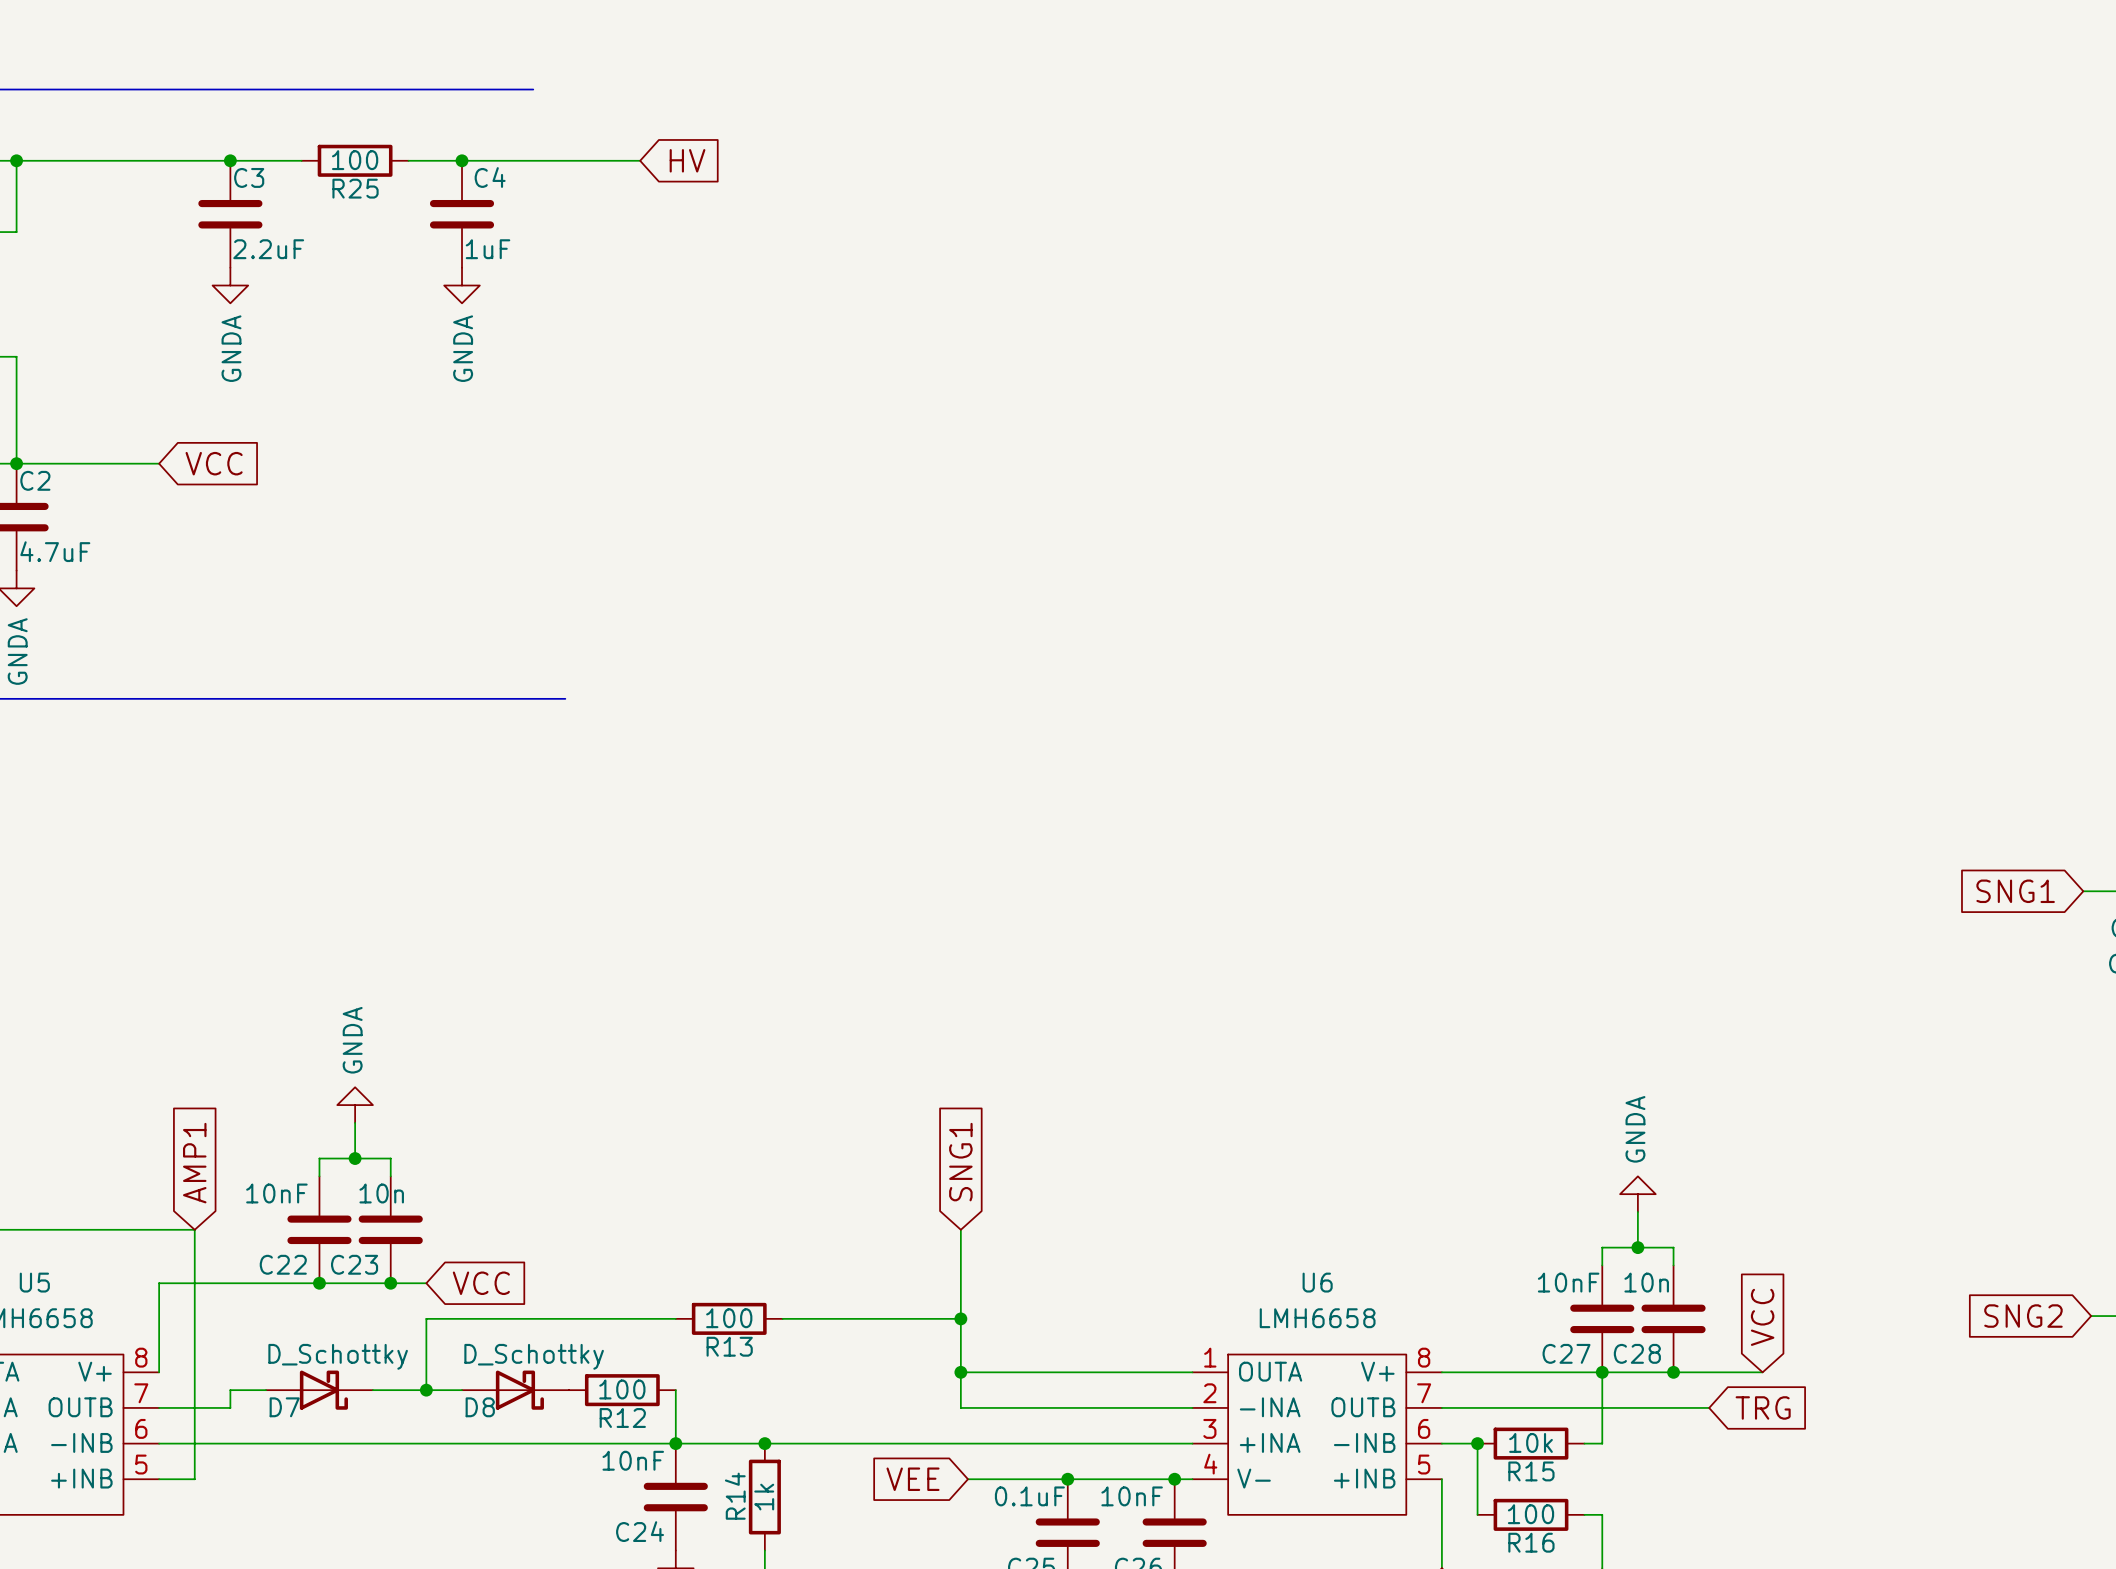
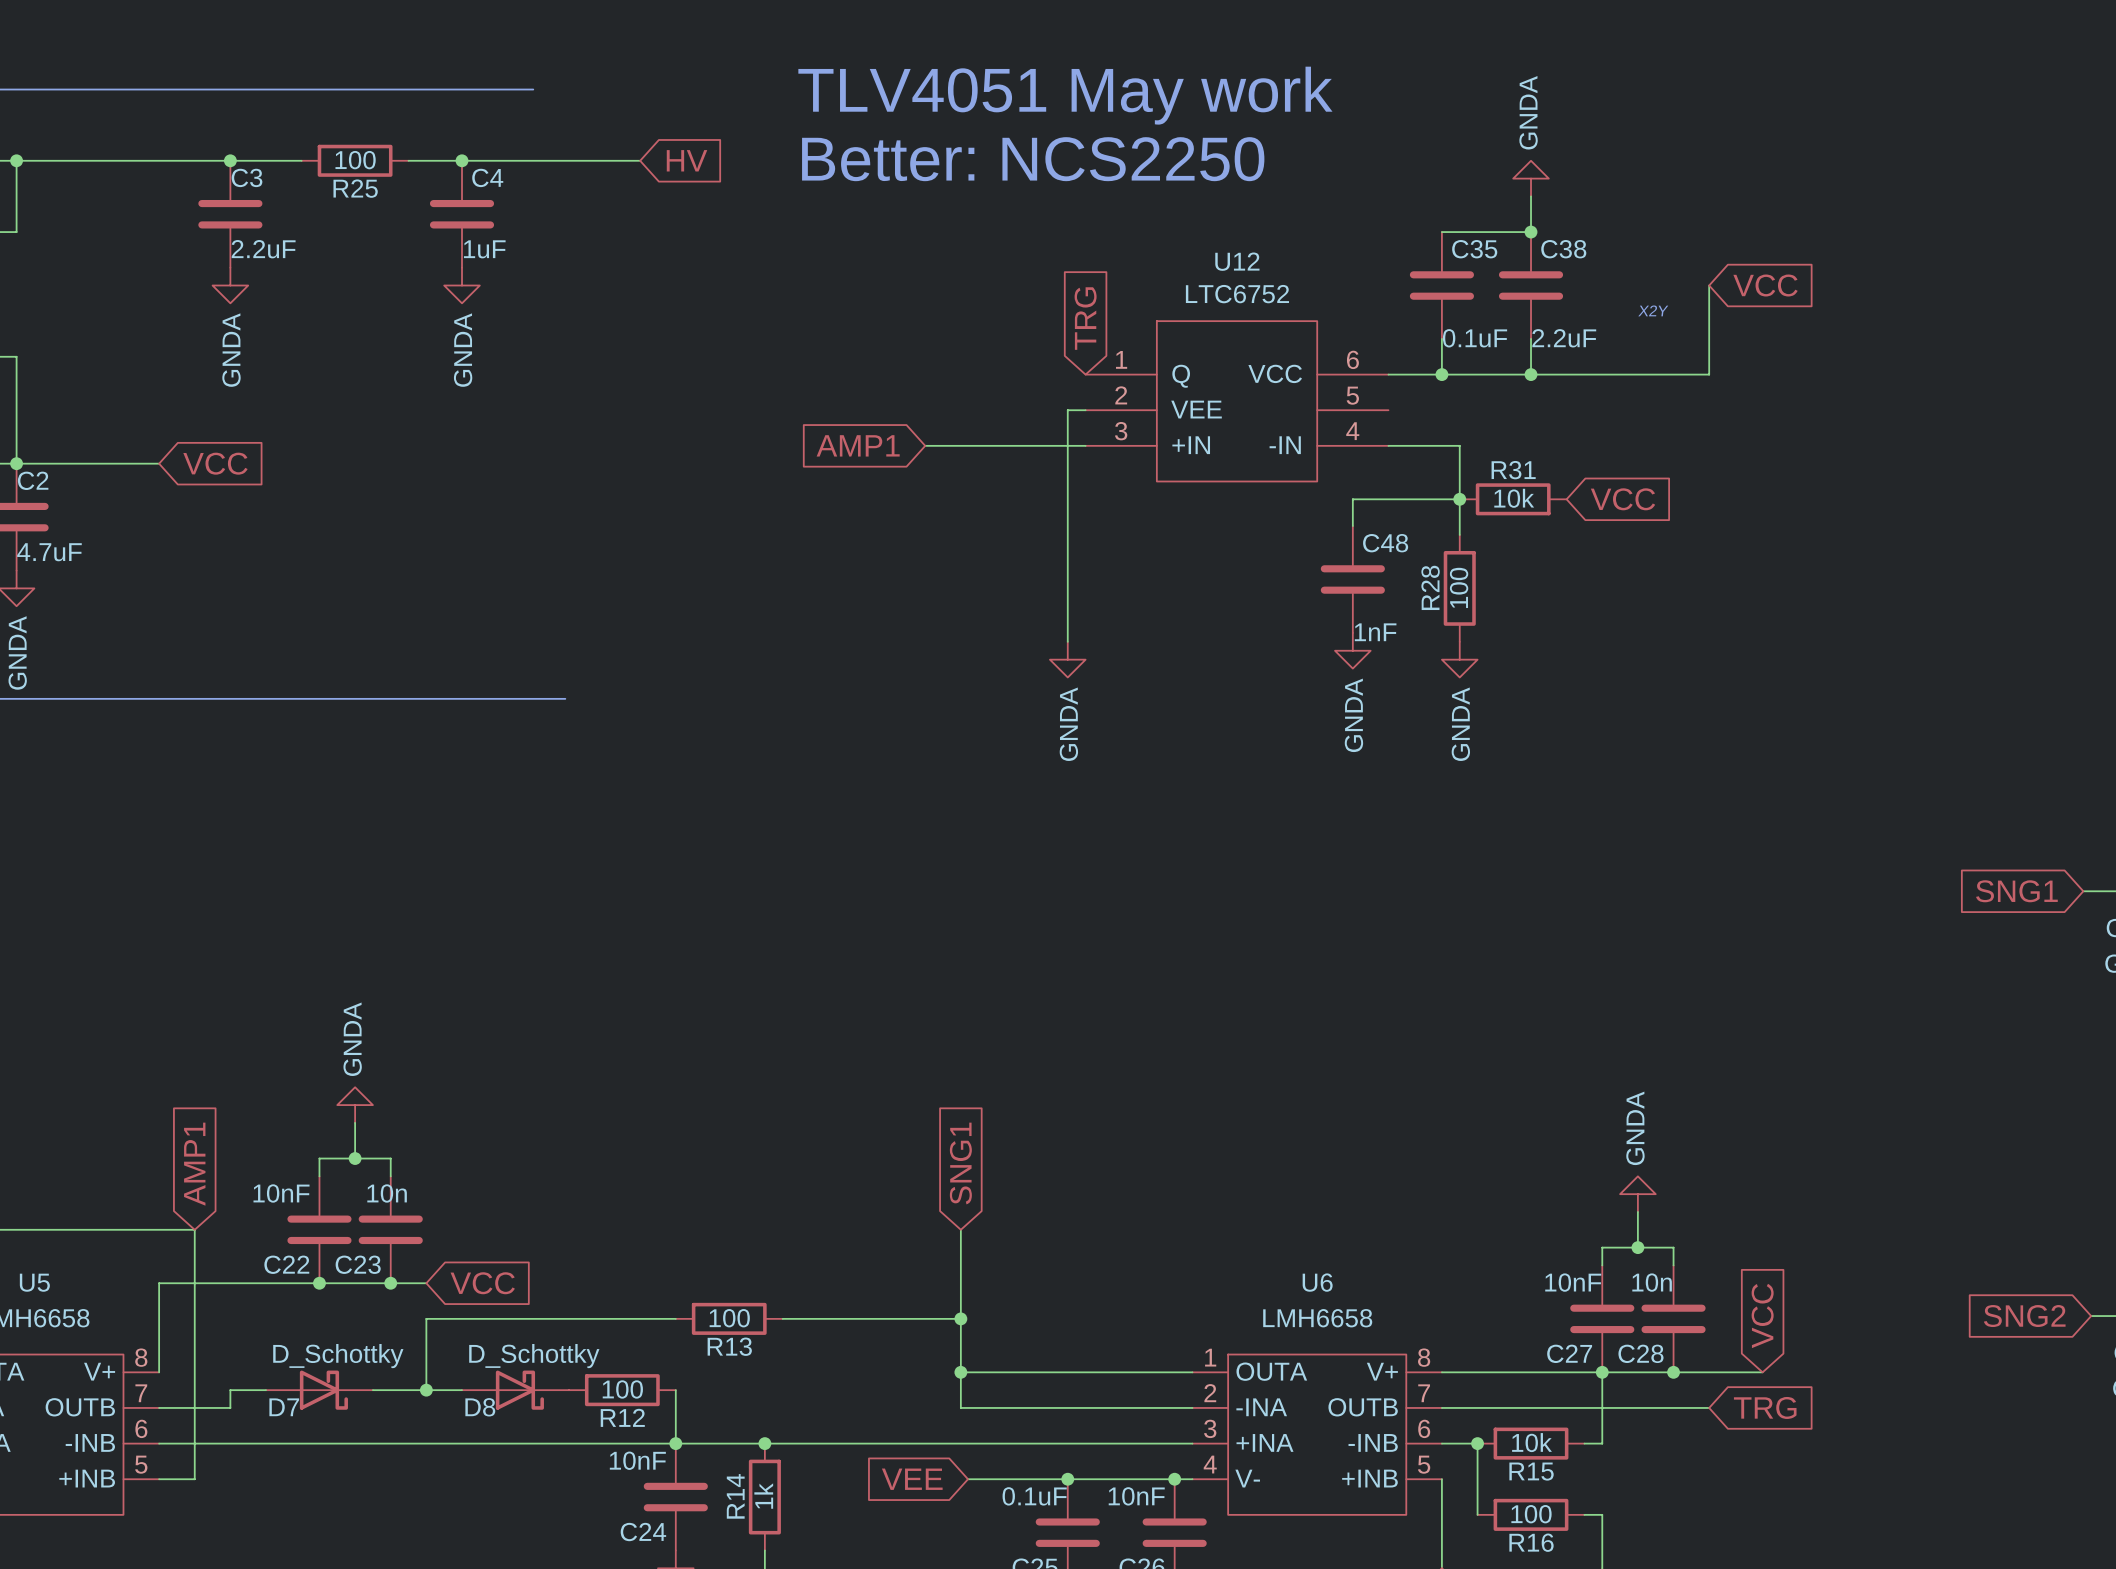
text: none -> TLV4051 May work (1065, 95)
text: none -> Better: NCS2250 (1033, 159)
power symbol: none -> GNDA (1531, 178)
wire: none -> (1531, 196) (1531, 232) (1441, 232)
junction: none -> (1531, 232)
C35: none -> 0.1uF (1441, 285)
C38: none -> 2.2uF (1531, 285)
wire: none -> (1709, 285) (1709, 374) (1388, 374)
global label: none -> VCC (1765, 285)
text: none -> X2Y (1653, 310)
global label: none -> TRG (1085, 318)
wire: none -> (1441, 338) (1441, 374)
wire: none -> (1531, 338) (1531, 374)
junction: none -> (1441, 374)
junction: none -> (1531, 374)
U12: none -> LTC6752 (1237, 401)
wire: none -> (1085, 410) (1067, 410) (1067, 641)
global label: none -> AMP1 (858, 445)
wire: none -> (925, 445) (1085, 445)
wire: none -> (1388, 445) (1459, 445) (1459, 534)
wire: none -> (1459, 499) (1352, 499) (1352, 526)
junction: none -> (1459, 499)
R31: none -> 10k (1513, 499)
global label: none -> VCC (1622, 499)
C48: none -> 1nF (1352, 579)
R28: none -> 100 (1459, 588)
power symbol: none -> GNDA (1352, 650)
power symbol: none -> GNDA (1067, 659)
power symbol: none -> GNDA (1459, 659)

